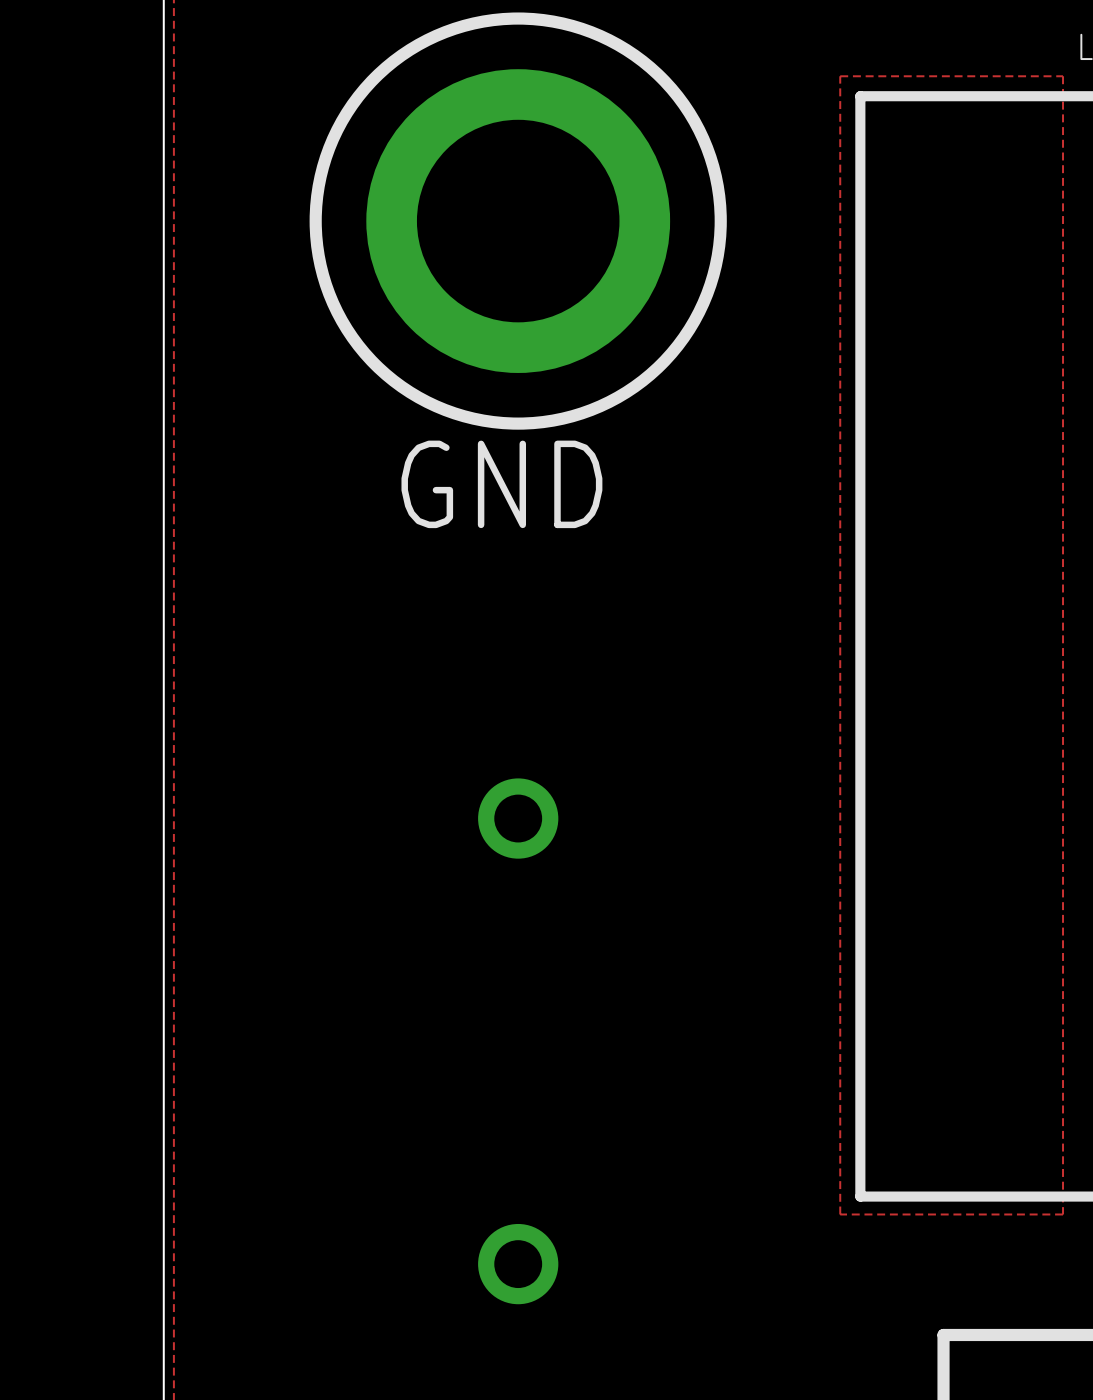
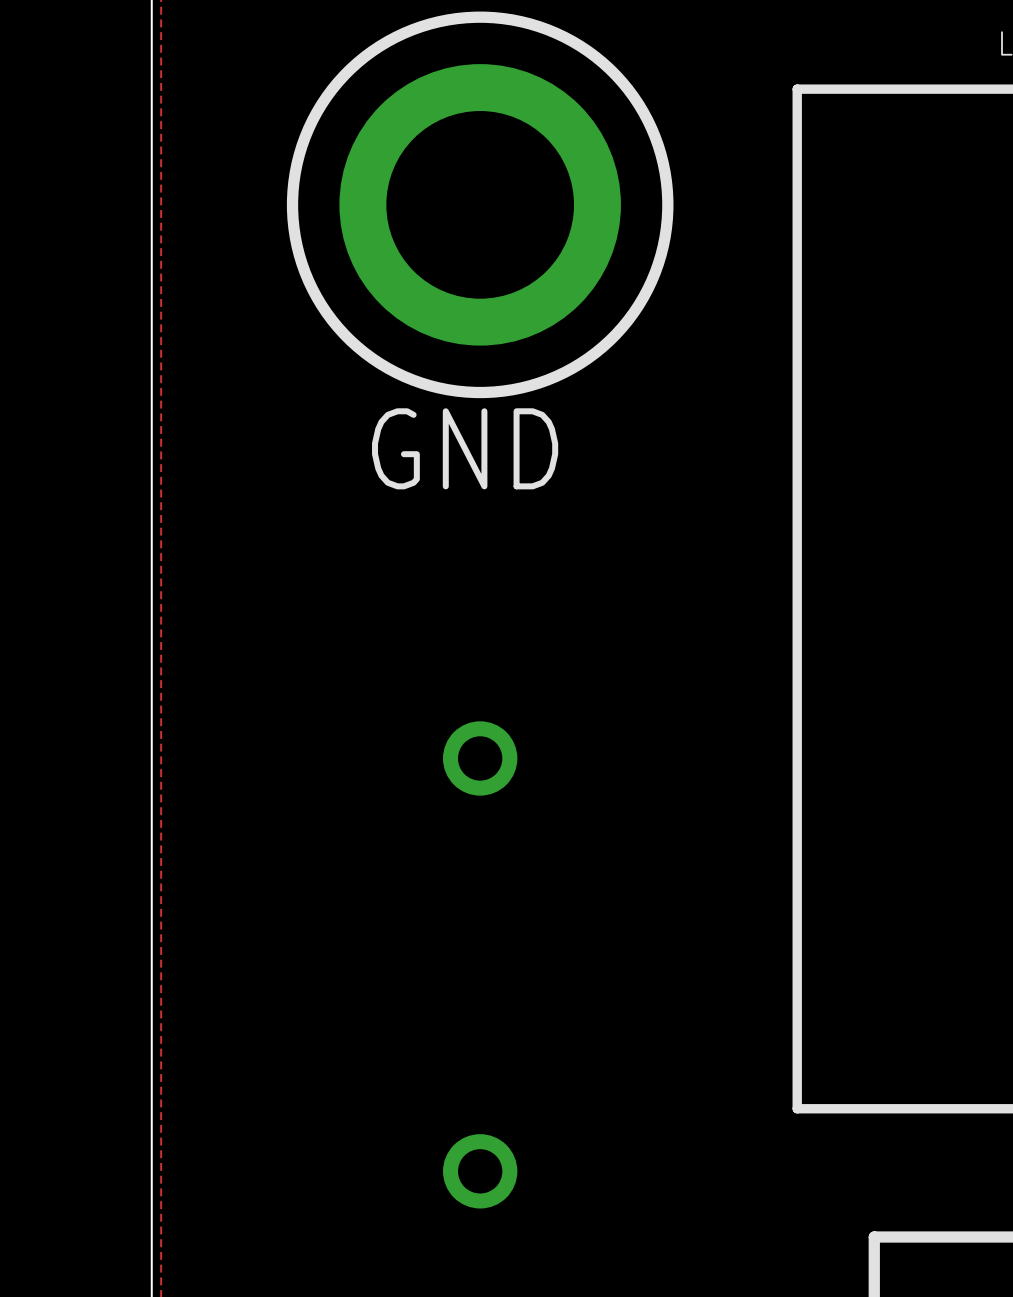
zone outline: (840, 76) (1063, 76) (1063, 1214) (840, 1214) (840, 76) -> none

